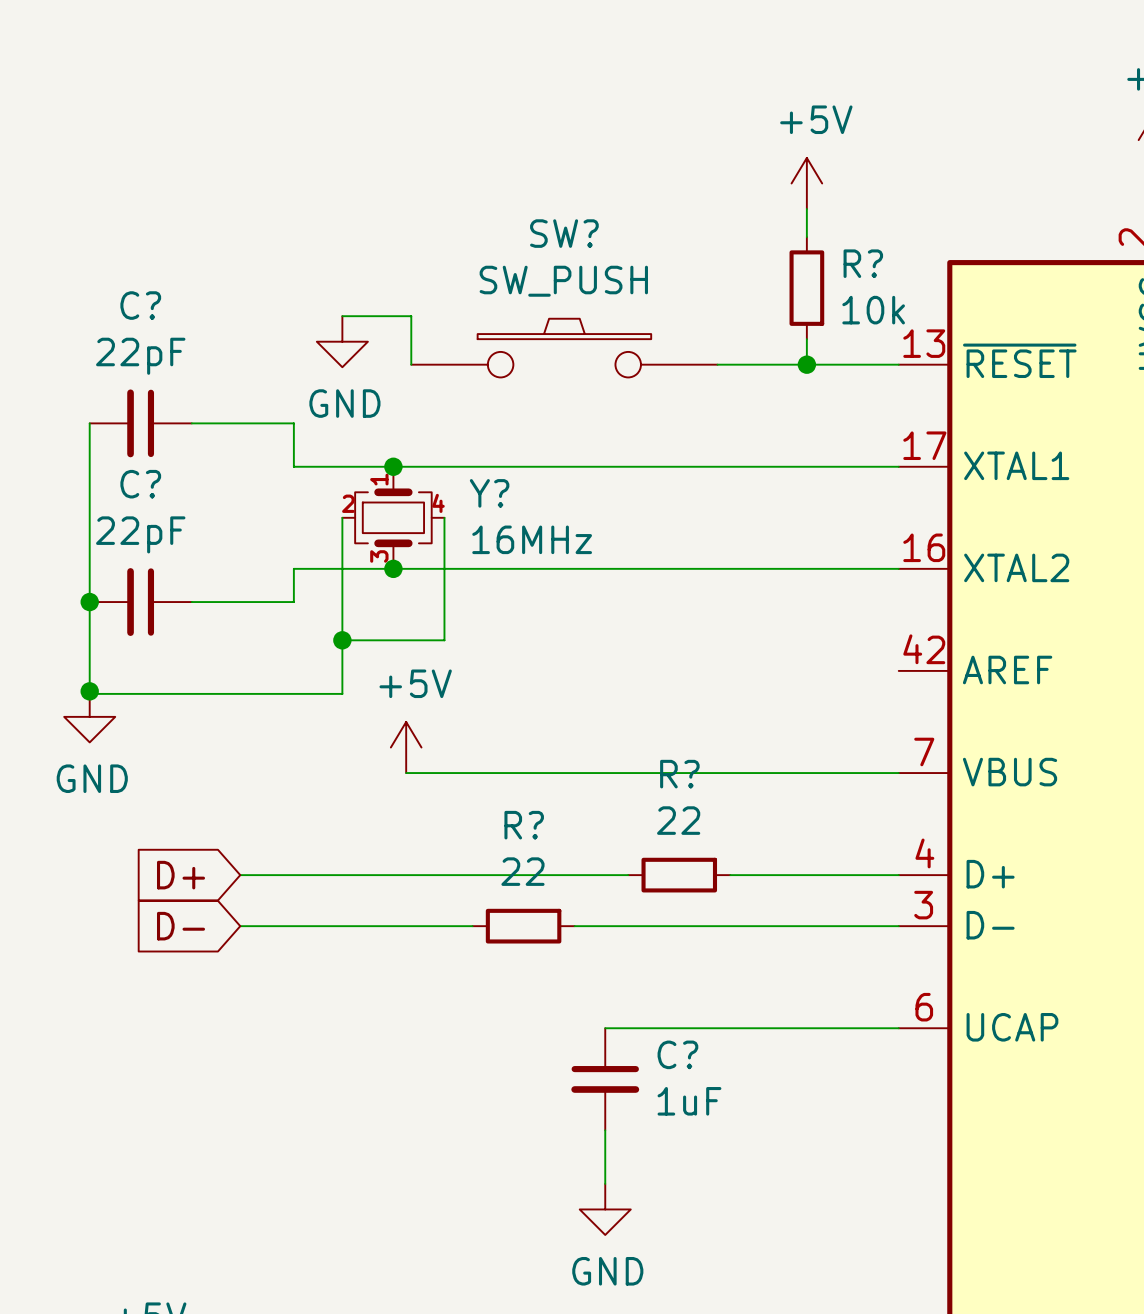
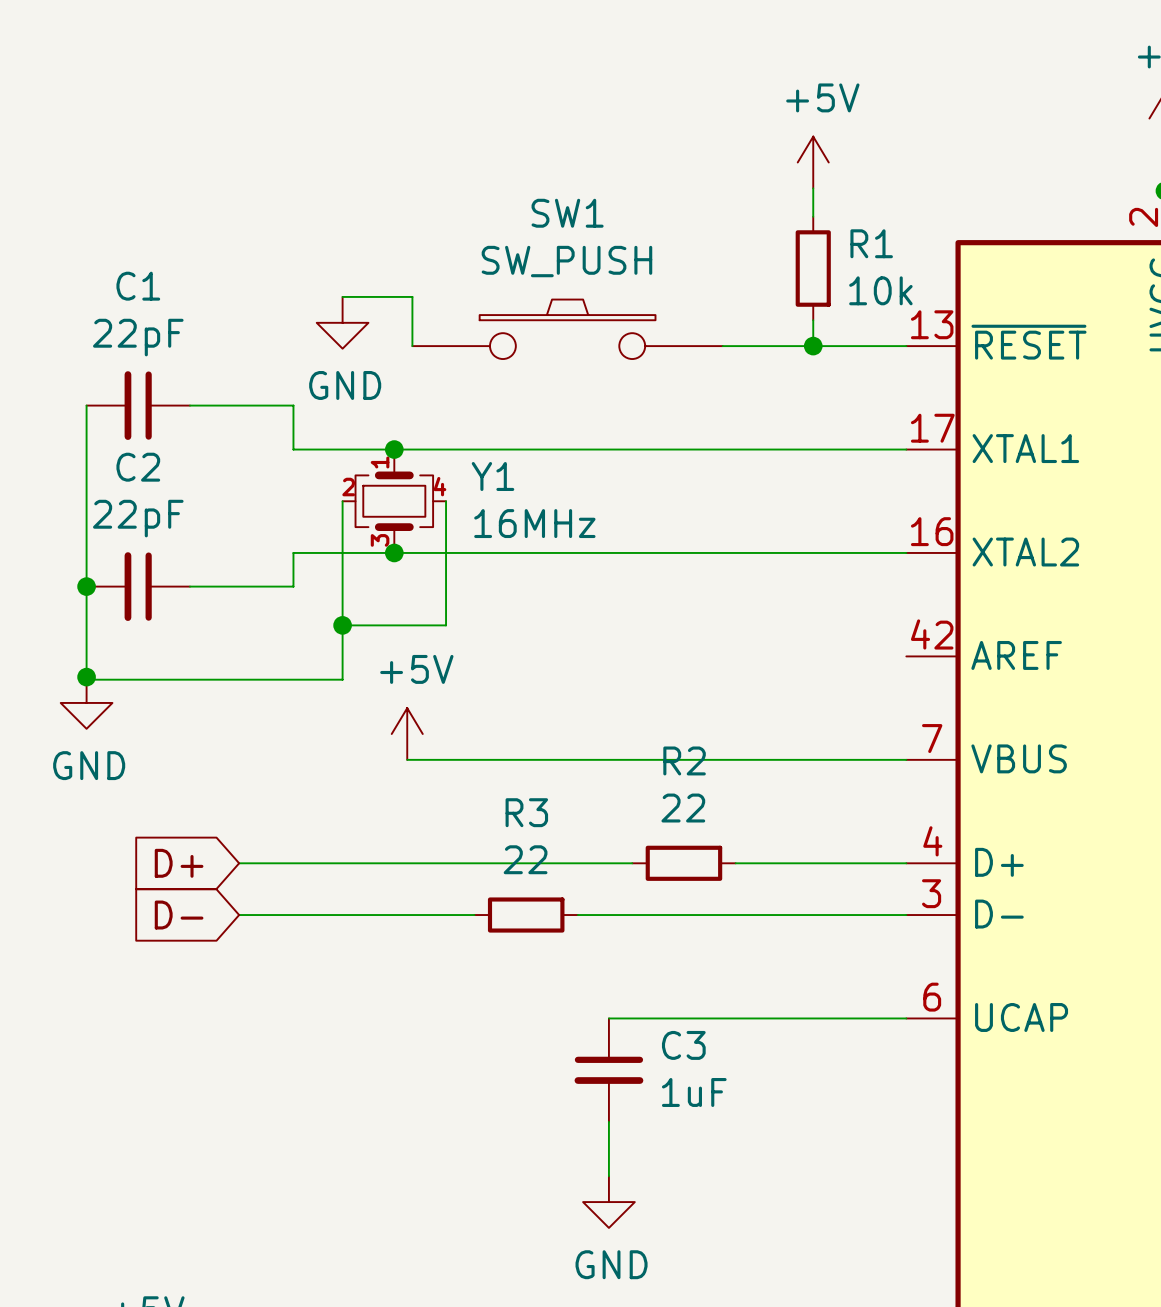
SW? name: SW? (564, 233) -> SW1 (567, 213)
R? name: R? (863, 263) -> R1 (871, 243)
C? name: C? (140, 305) -> C1 (138, 286)
C? name: C? (140, 484) -> C2 (138, 467)
Y? name: Y? (489, 493) -> Y1 (493, 476)
R? name: R? (679, 774) -> R2 (684, 760)
R? name: R? (524, 825) -> R3 (526, 812)
C? name: C? (677, 1054) -> C3 (683, 1045)

